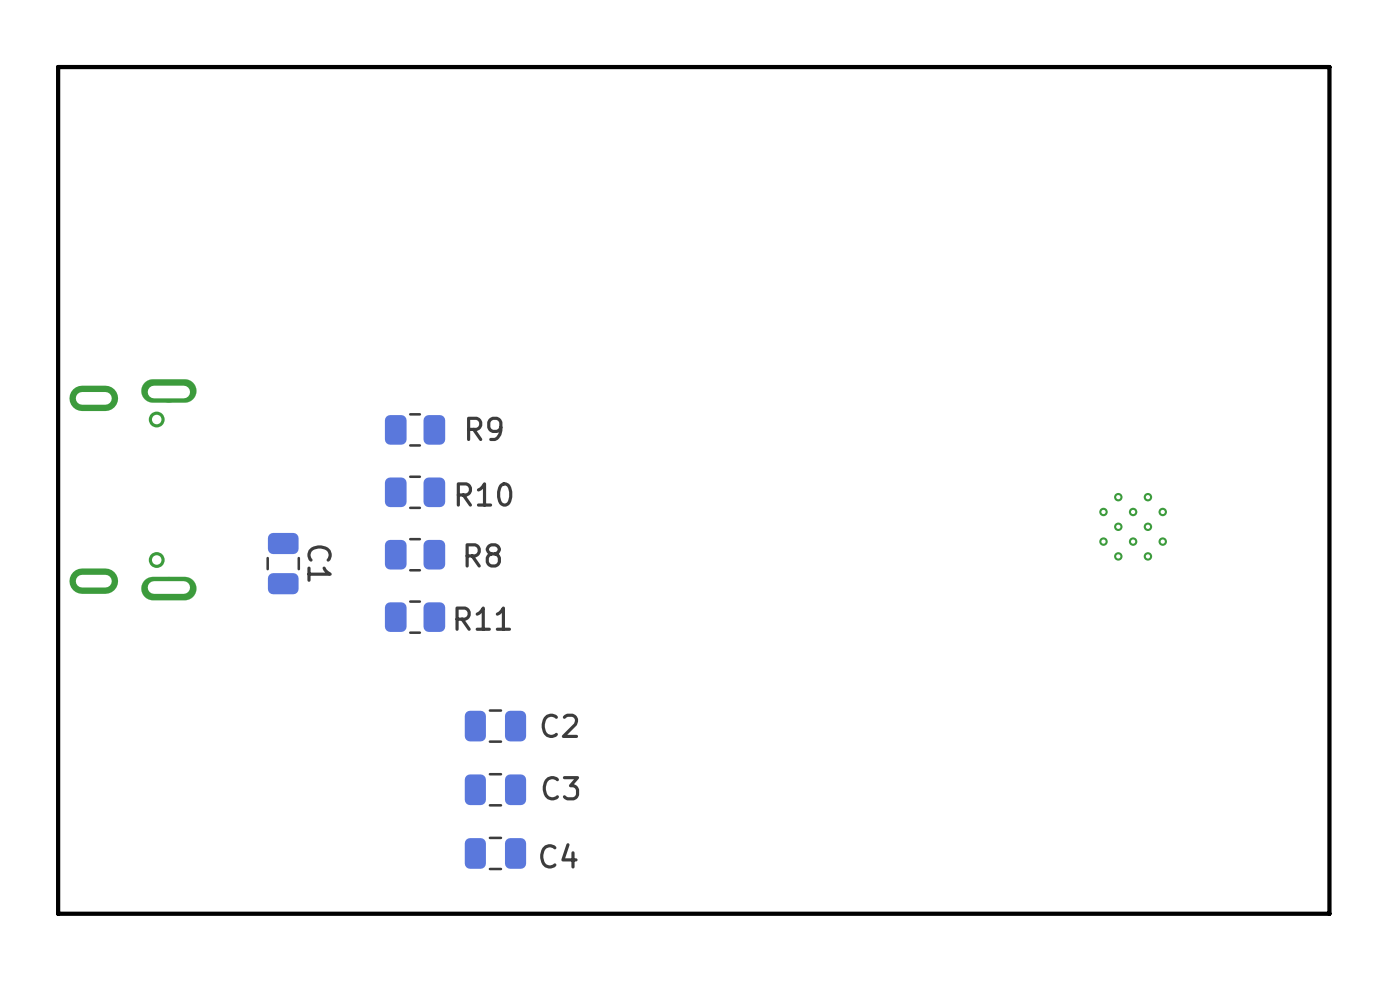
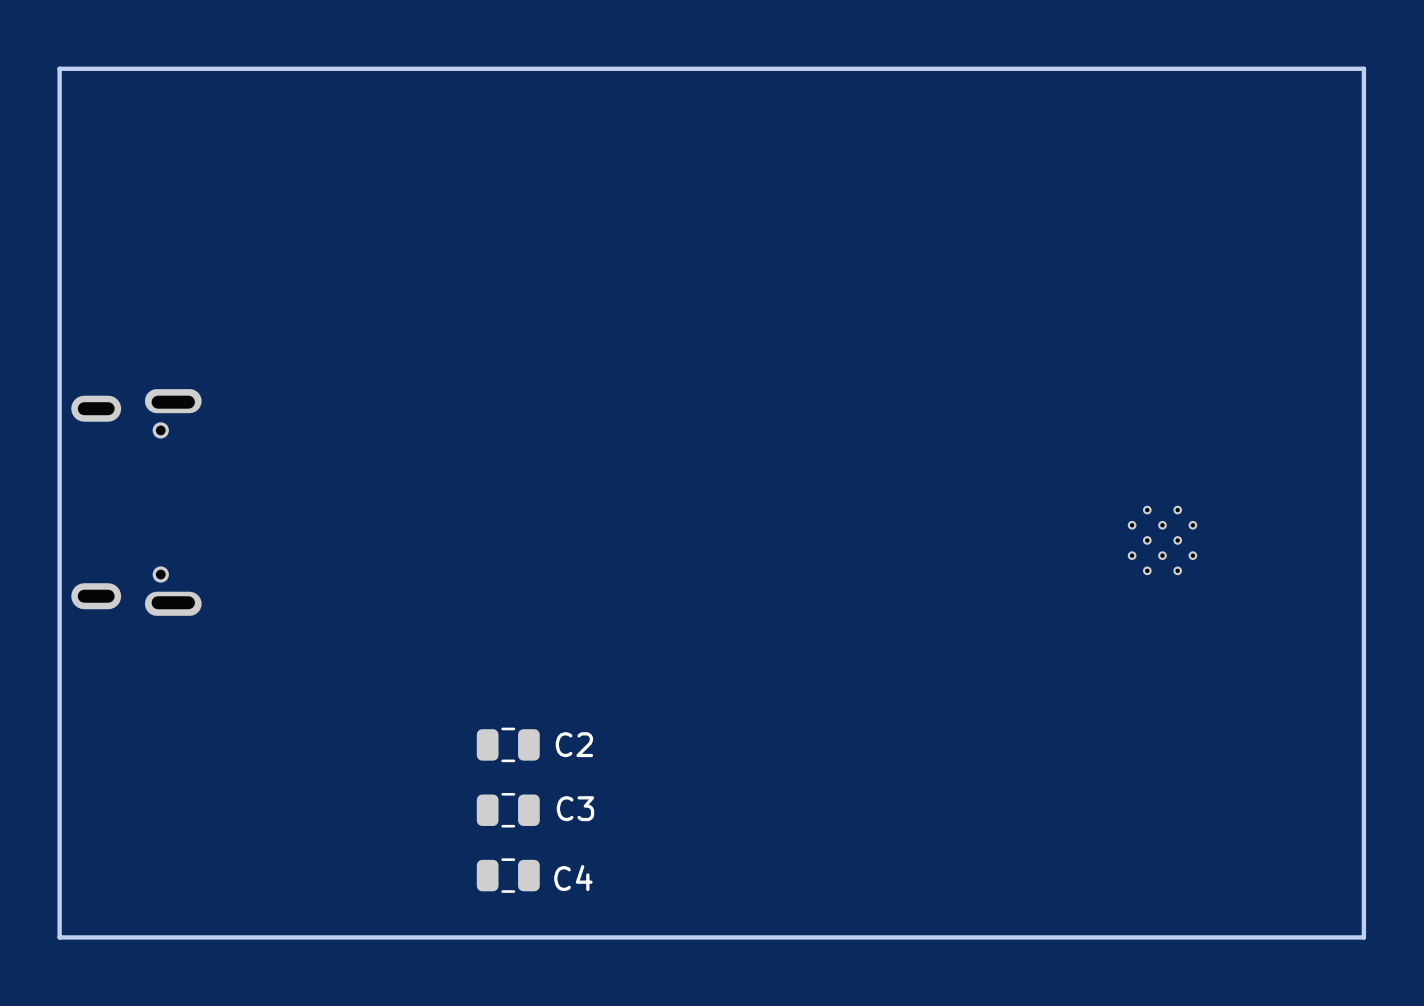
R9: (415, 429) -> none
R10: (415, 492) -> none
R8: (415, 554) -> none
C1: (283, 563) -> none
R11: (415, 617) -> none

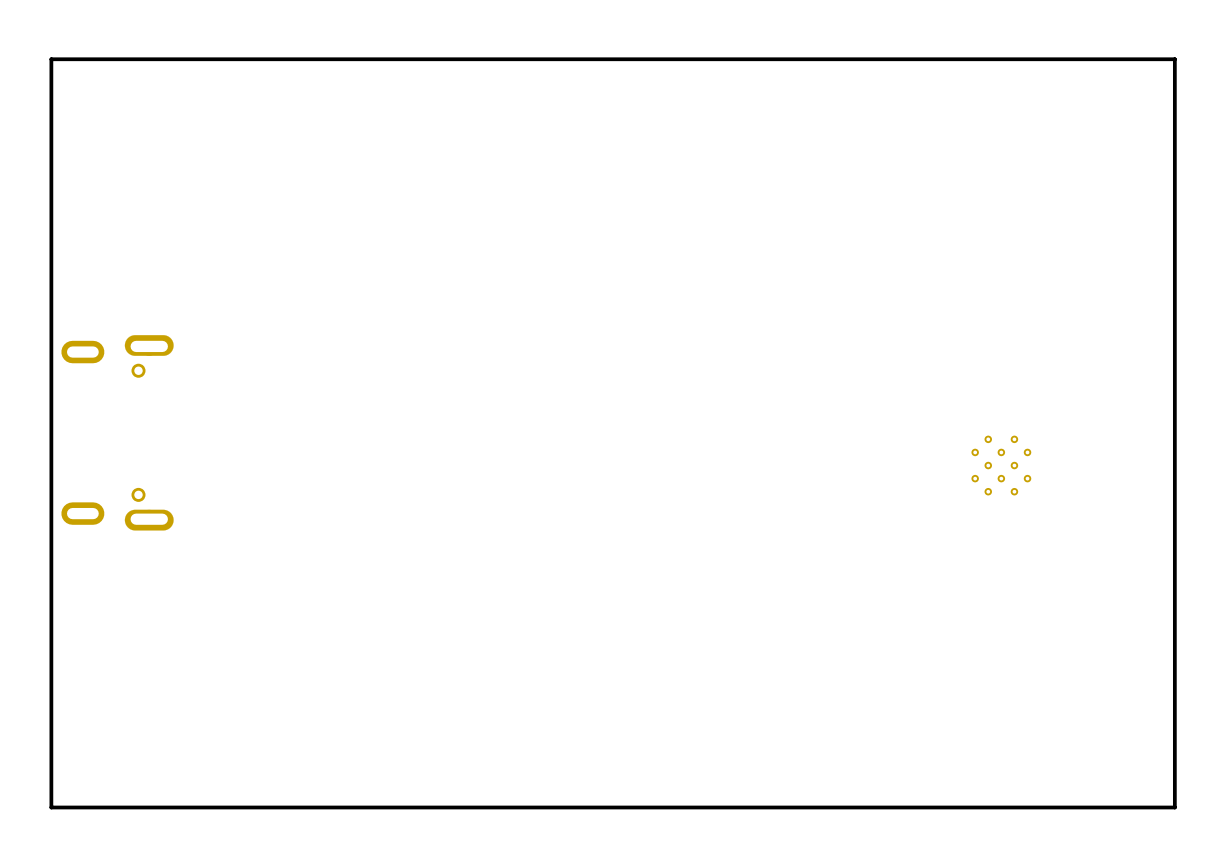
C2: (508, 744) -> none
C3: (508, 810) -> none
C4: (508, 875) -> none

